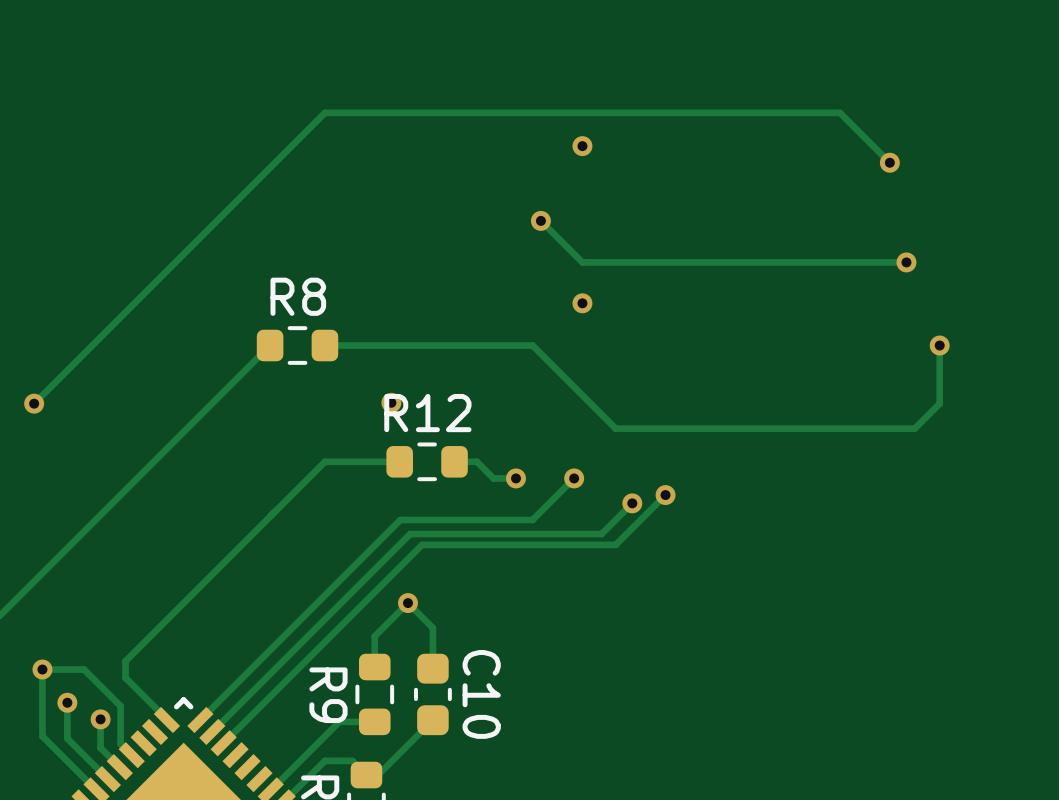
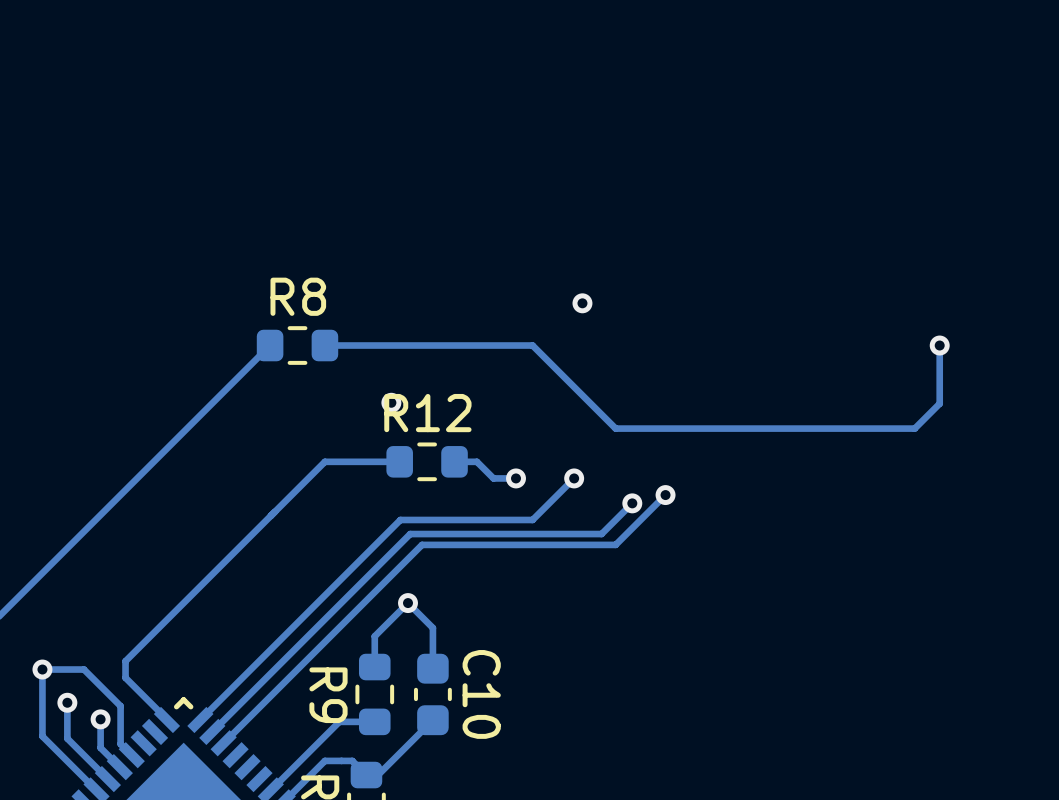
via: (582, 146) -> none
track: (889, 162) (840, 112) (324, 112) (34, 403) -> none
via: (889, 162) -> none
track: (540, 220) (582, 262) (906, 262) -> none
via: (540, 220) -> none
via: (906, 262) -> none
via: (34, 403) -> none

